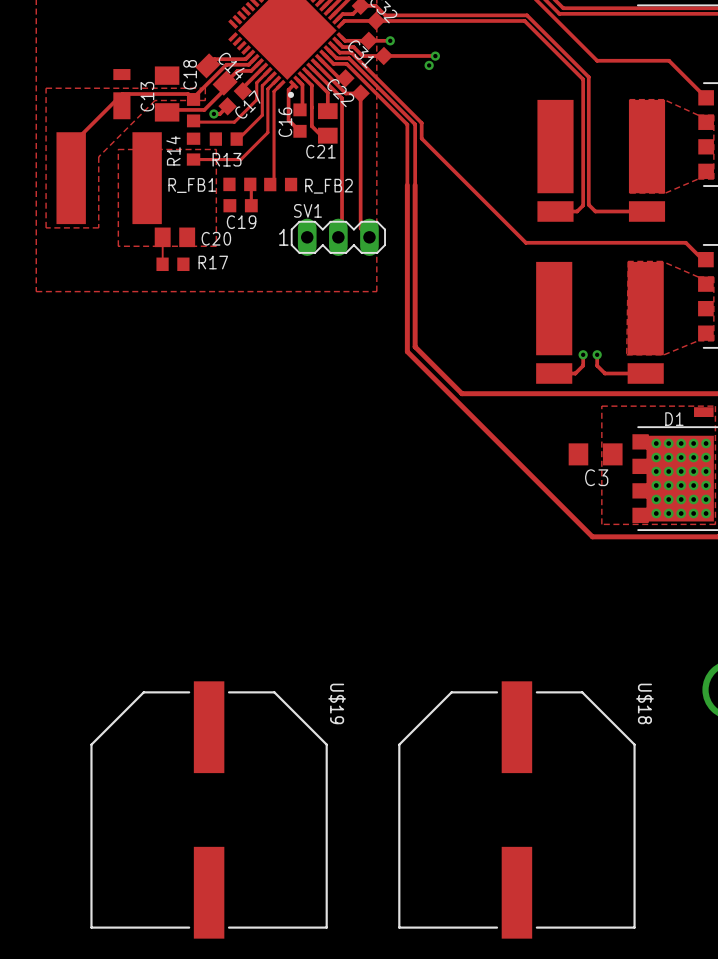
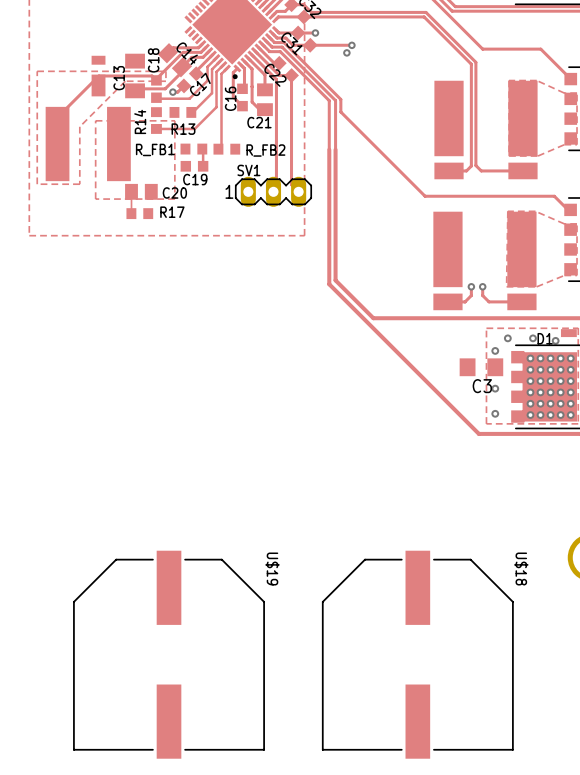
via: none -> (507, 338)
via: none -> (532, 338)
via: none -> (555, 340)
via: none -> (495, 350)
via: none -> (495, 388)
via: none -> (495, 413)

